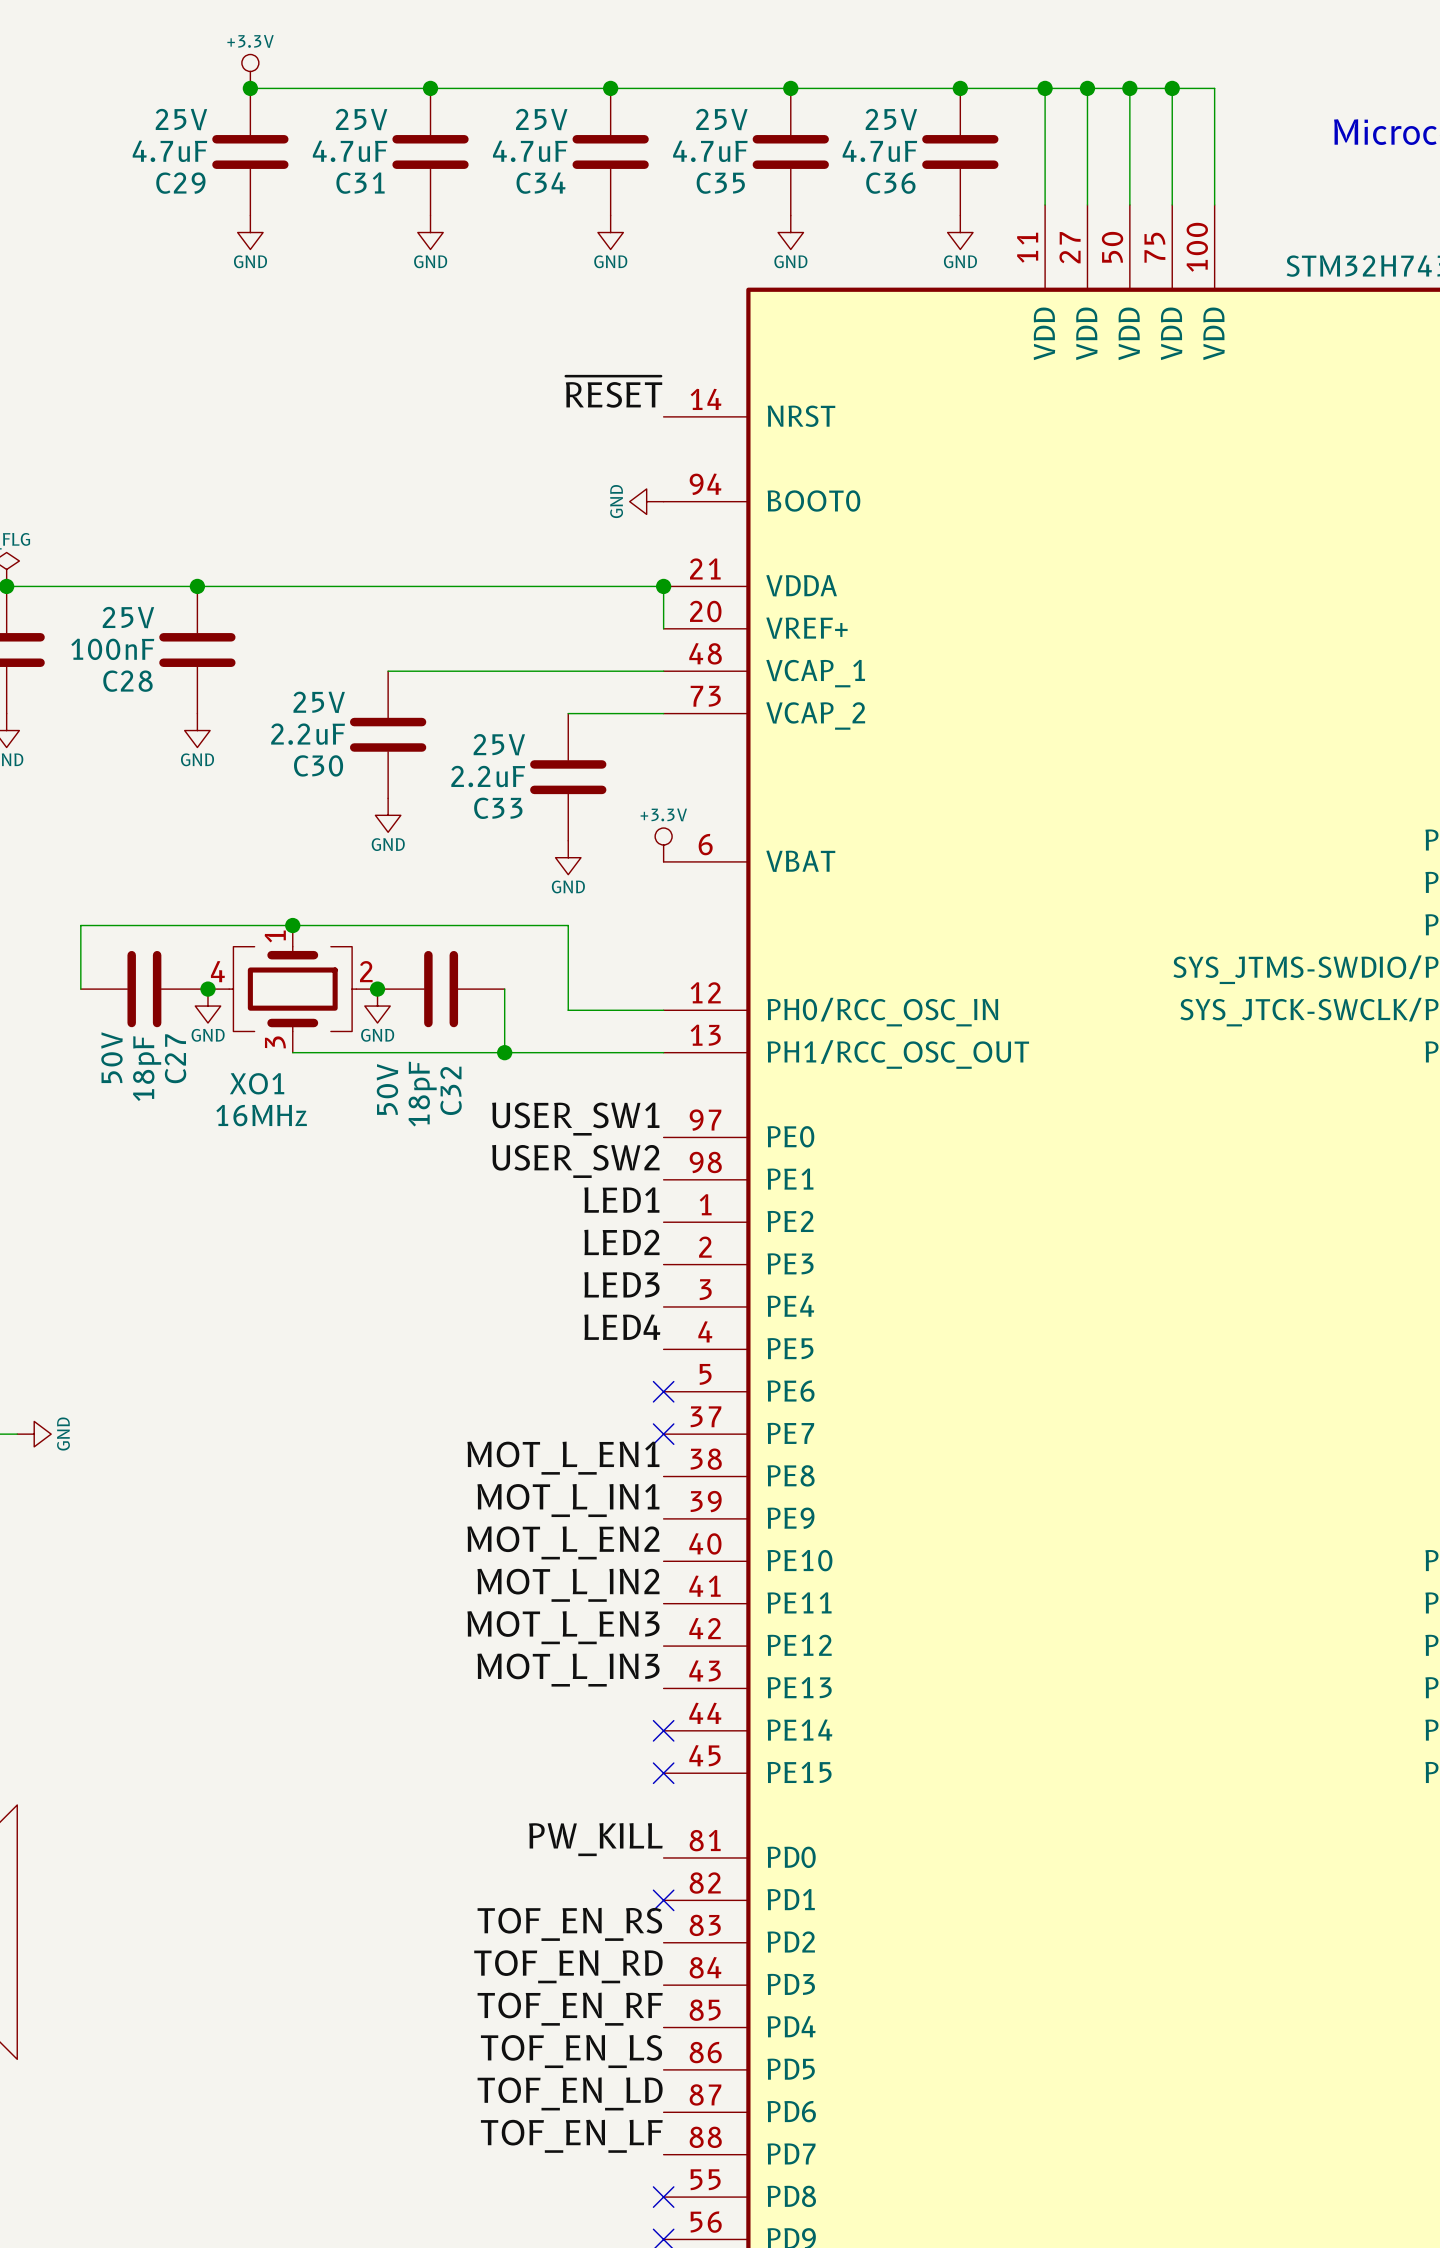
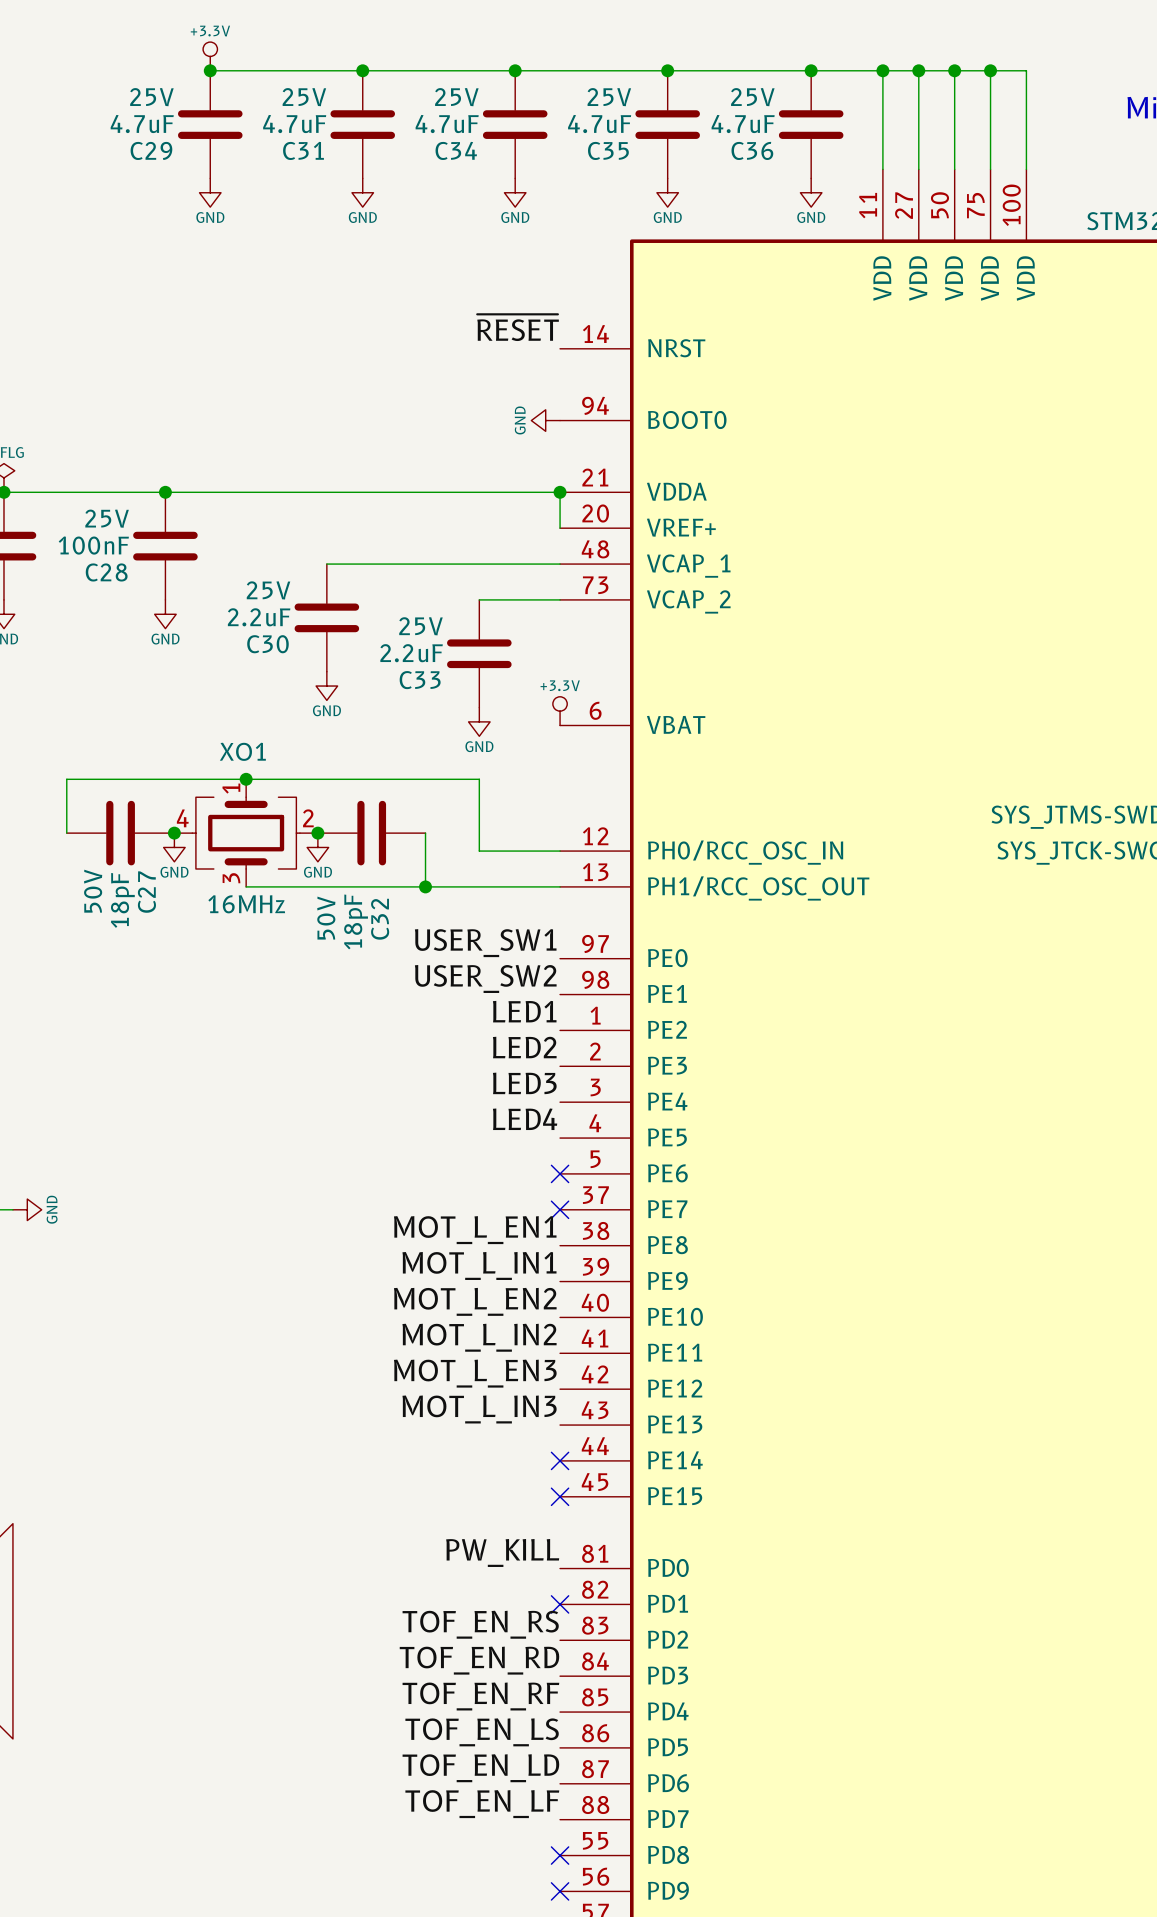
XO1 name position: XO1 (257, 1083) -> XO1 (242, 751)
XO1 text position: 16MHz (261, 1115) -> 16MHz (246, 904)

